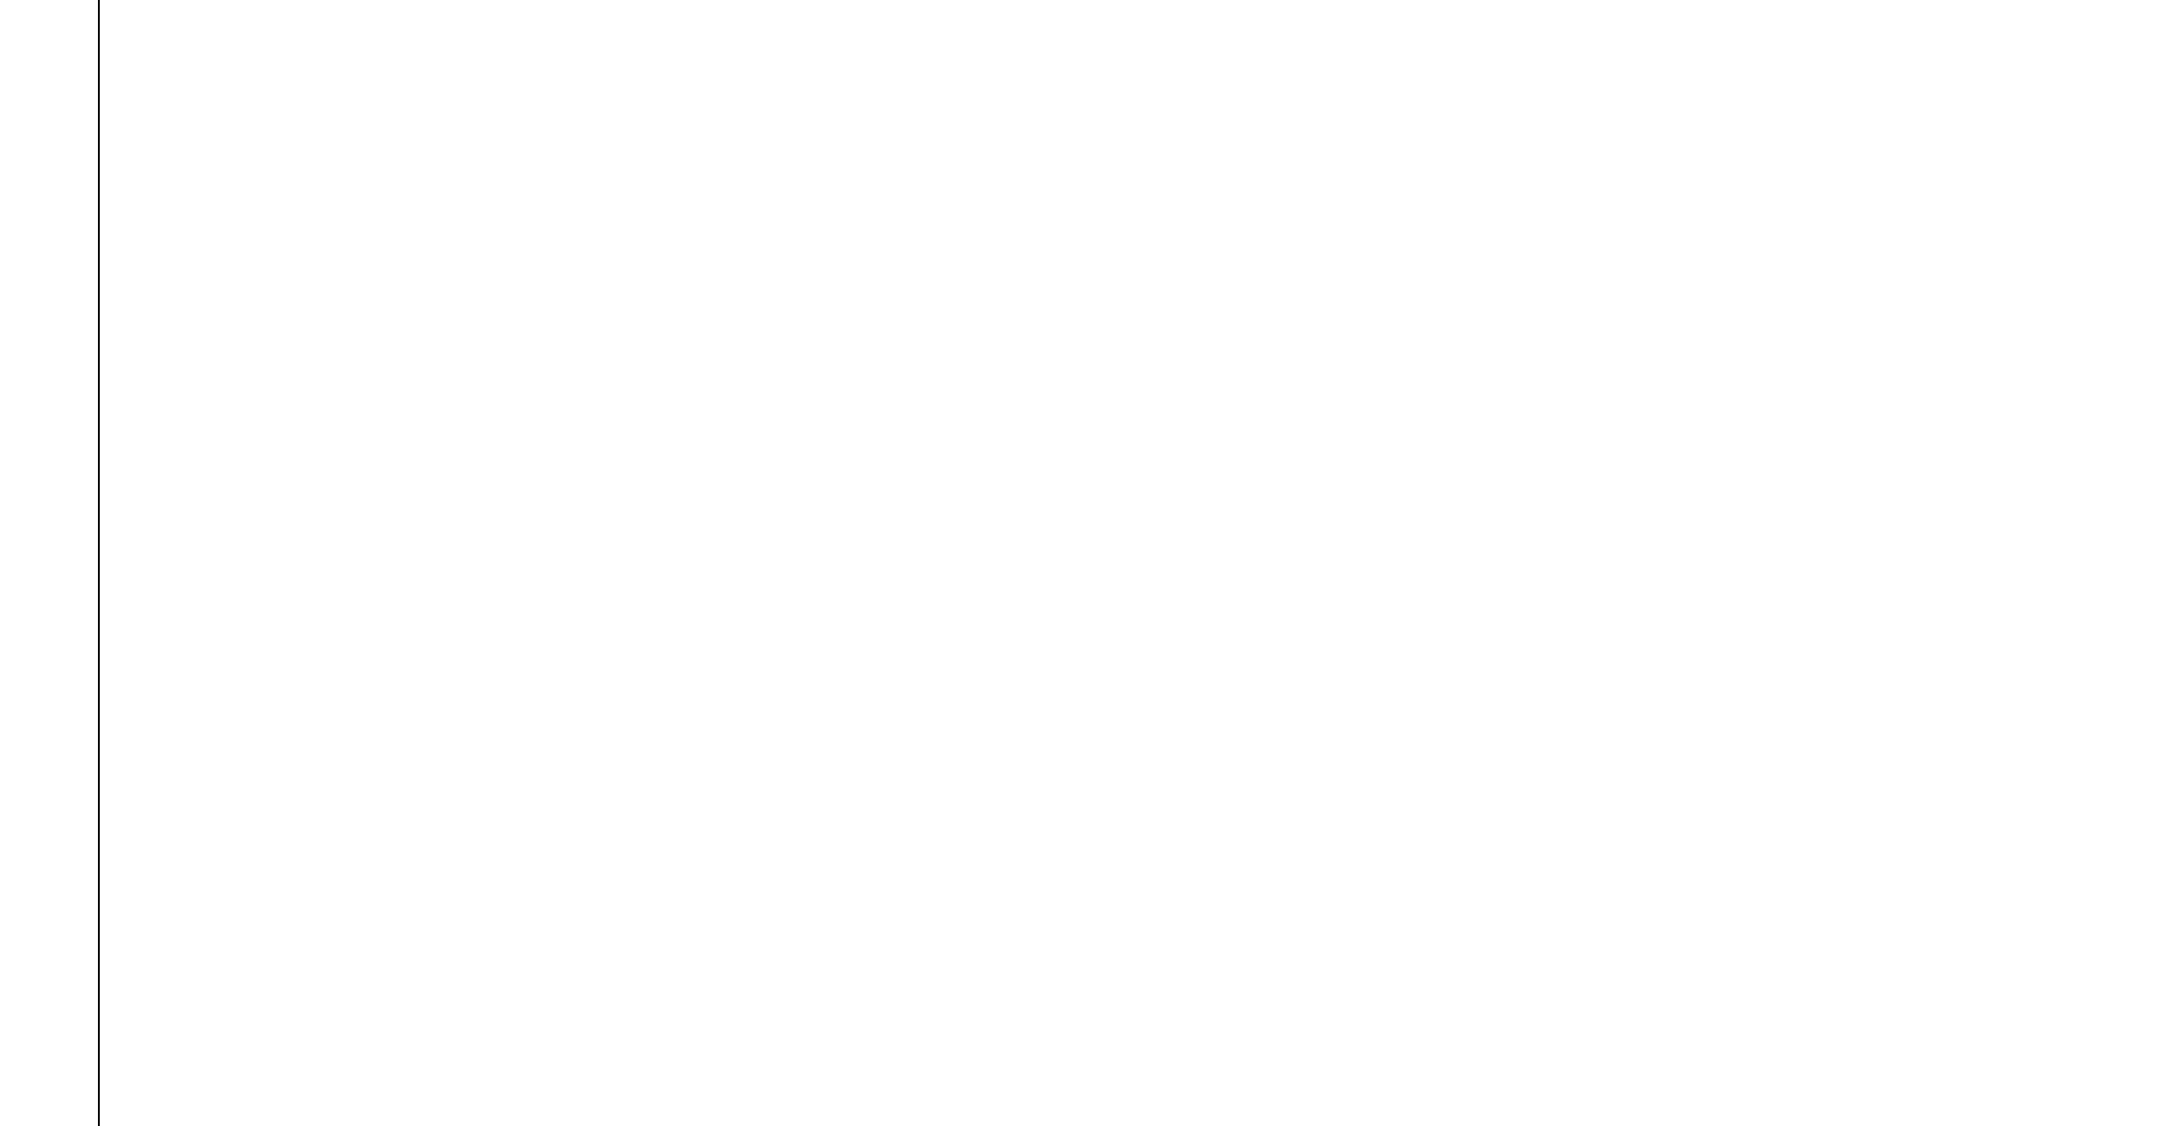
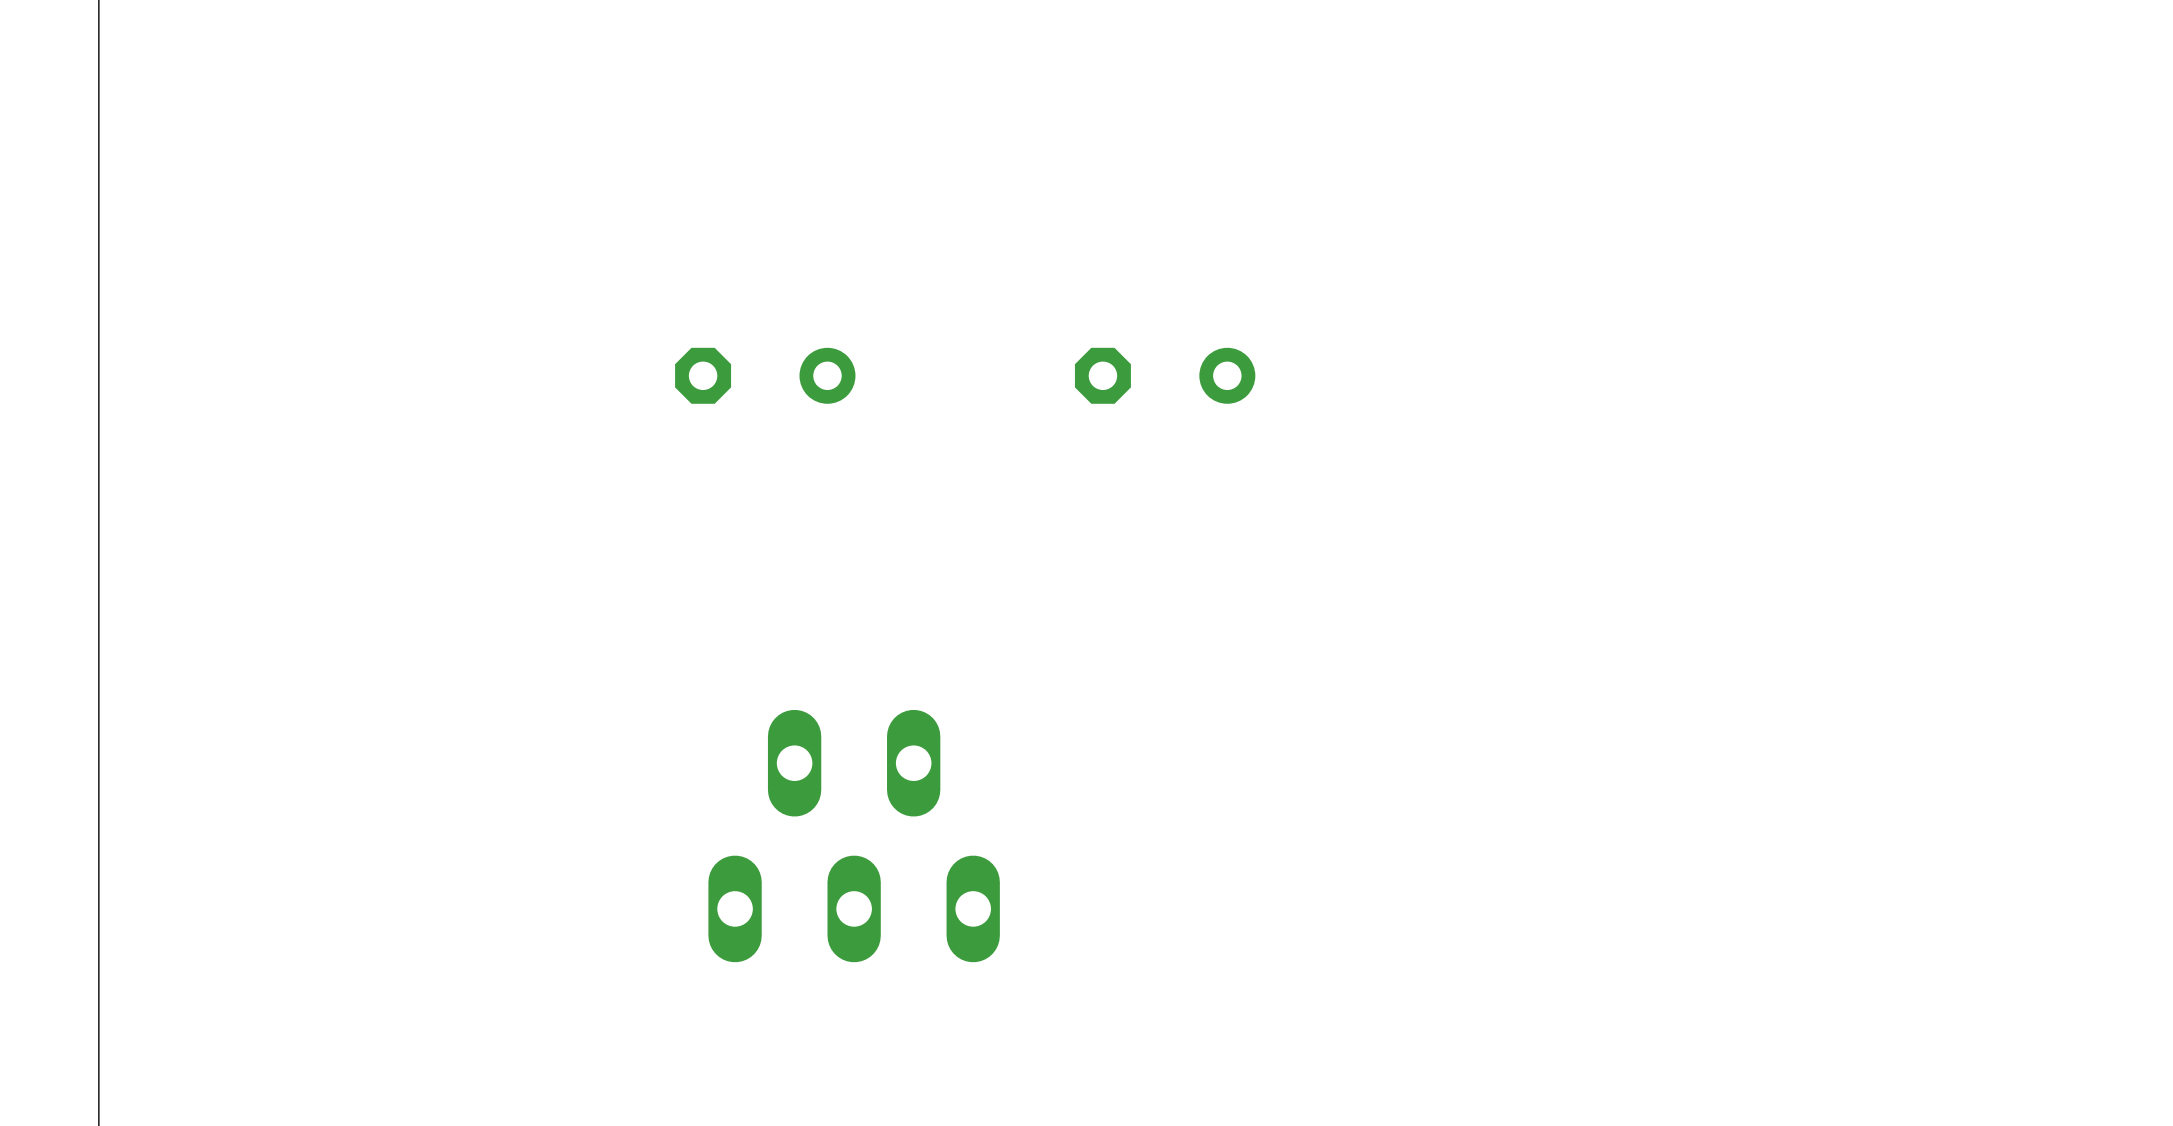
part: none -> (765, 375)
part: none -> (1165, 375)
part: none -> (854, 836)

